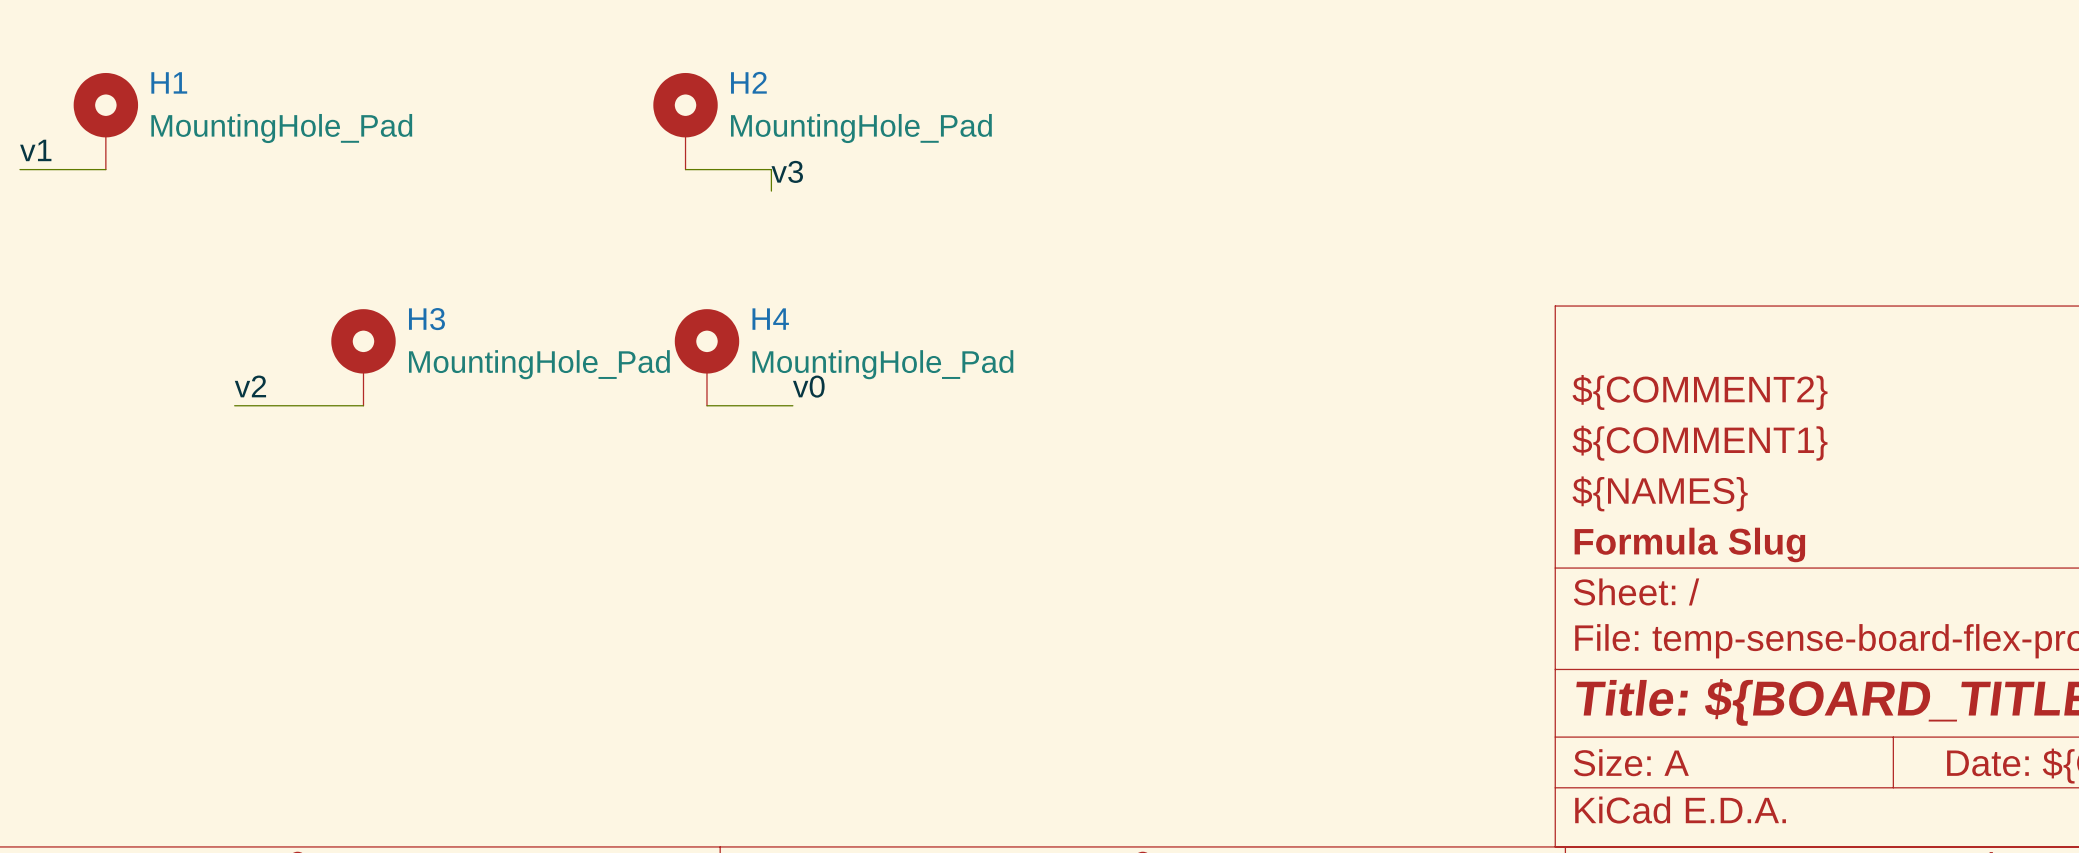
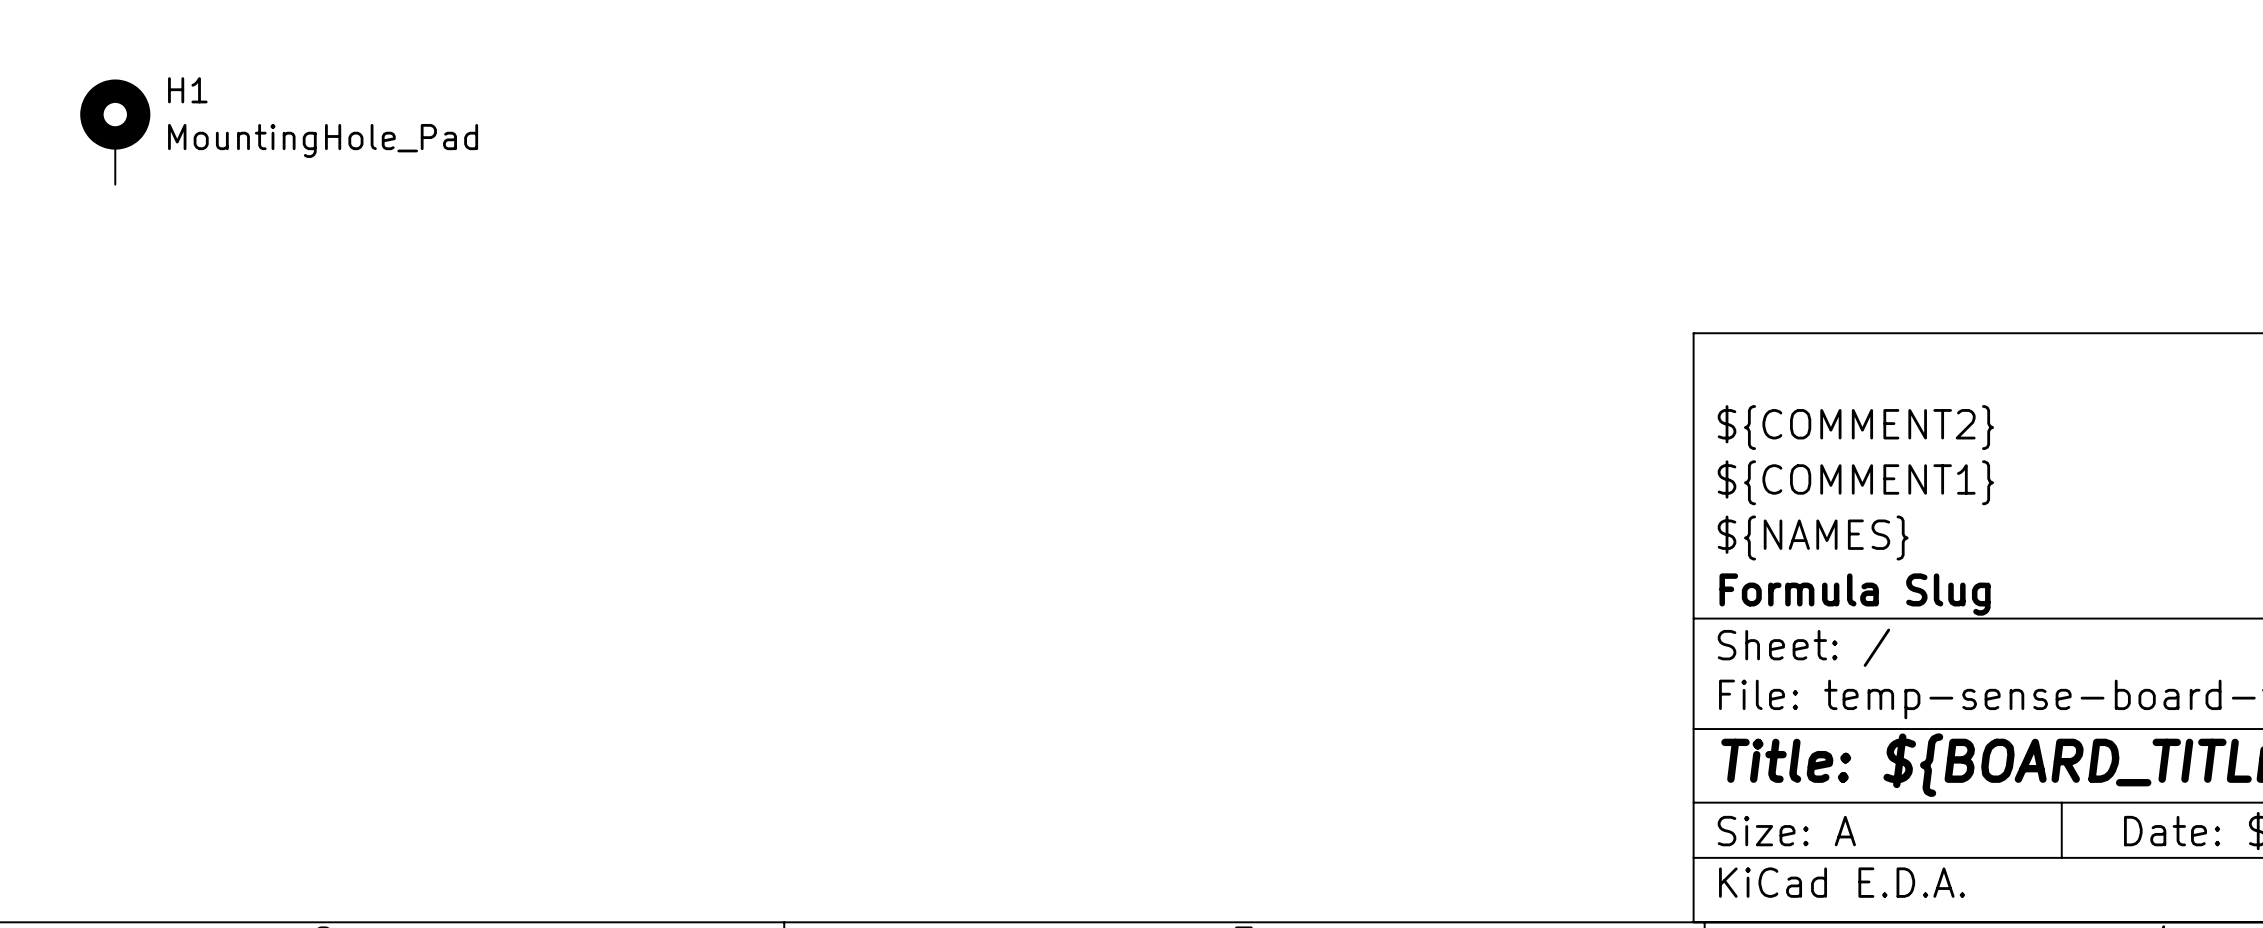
H2: MountingHole_Pad (685, 121) -> none
label: v1 (35, 150) -> none
wire: (19, 169) (105, 169) -> none
wire: (685, 169) (771, 169) (771, 191) -> none
label: v3 (787, 171) -> none
H3: MountingHole_Pad (363, 357) -> none
H4: MountingHole_Pad (706, 357) -> none
label: v2 (250, 386) -> none
label: v0 (808, 386) -> none
wire: (234, 405) (363, 405) -> none
wire: (706, 405) (792, 405) -> none

